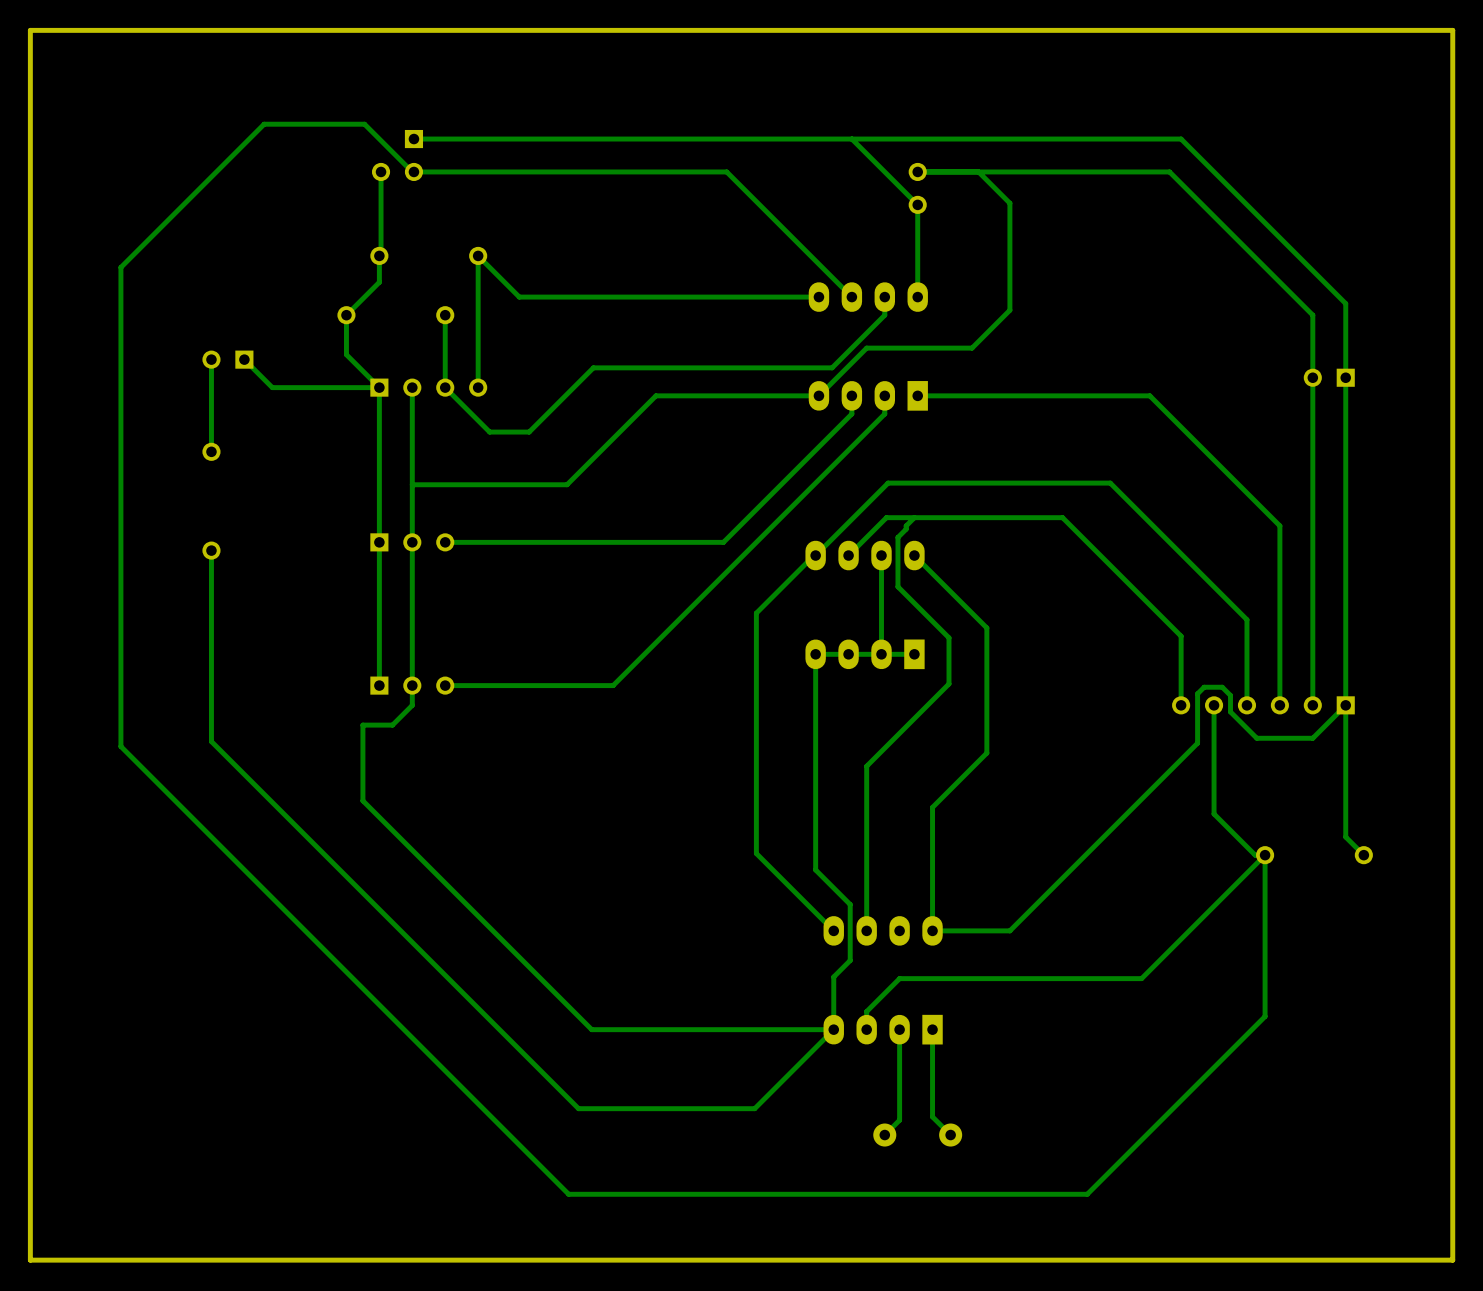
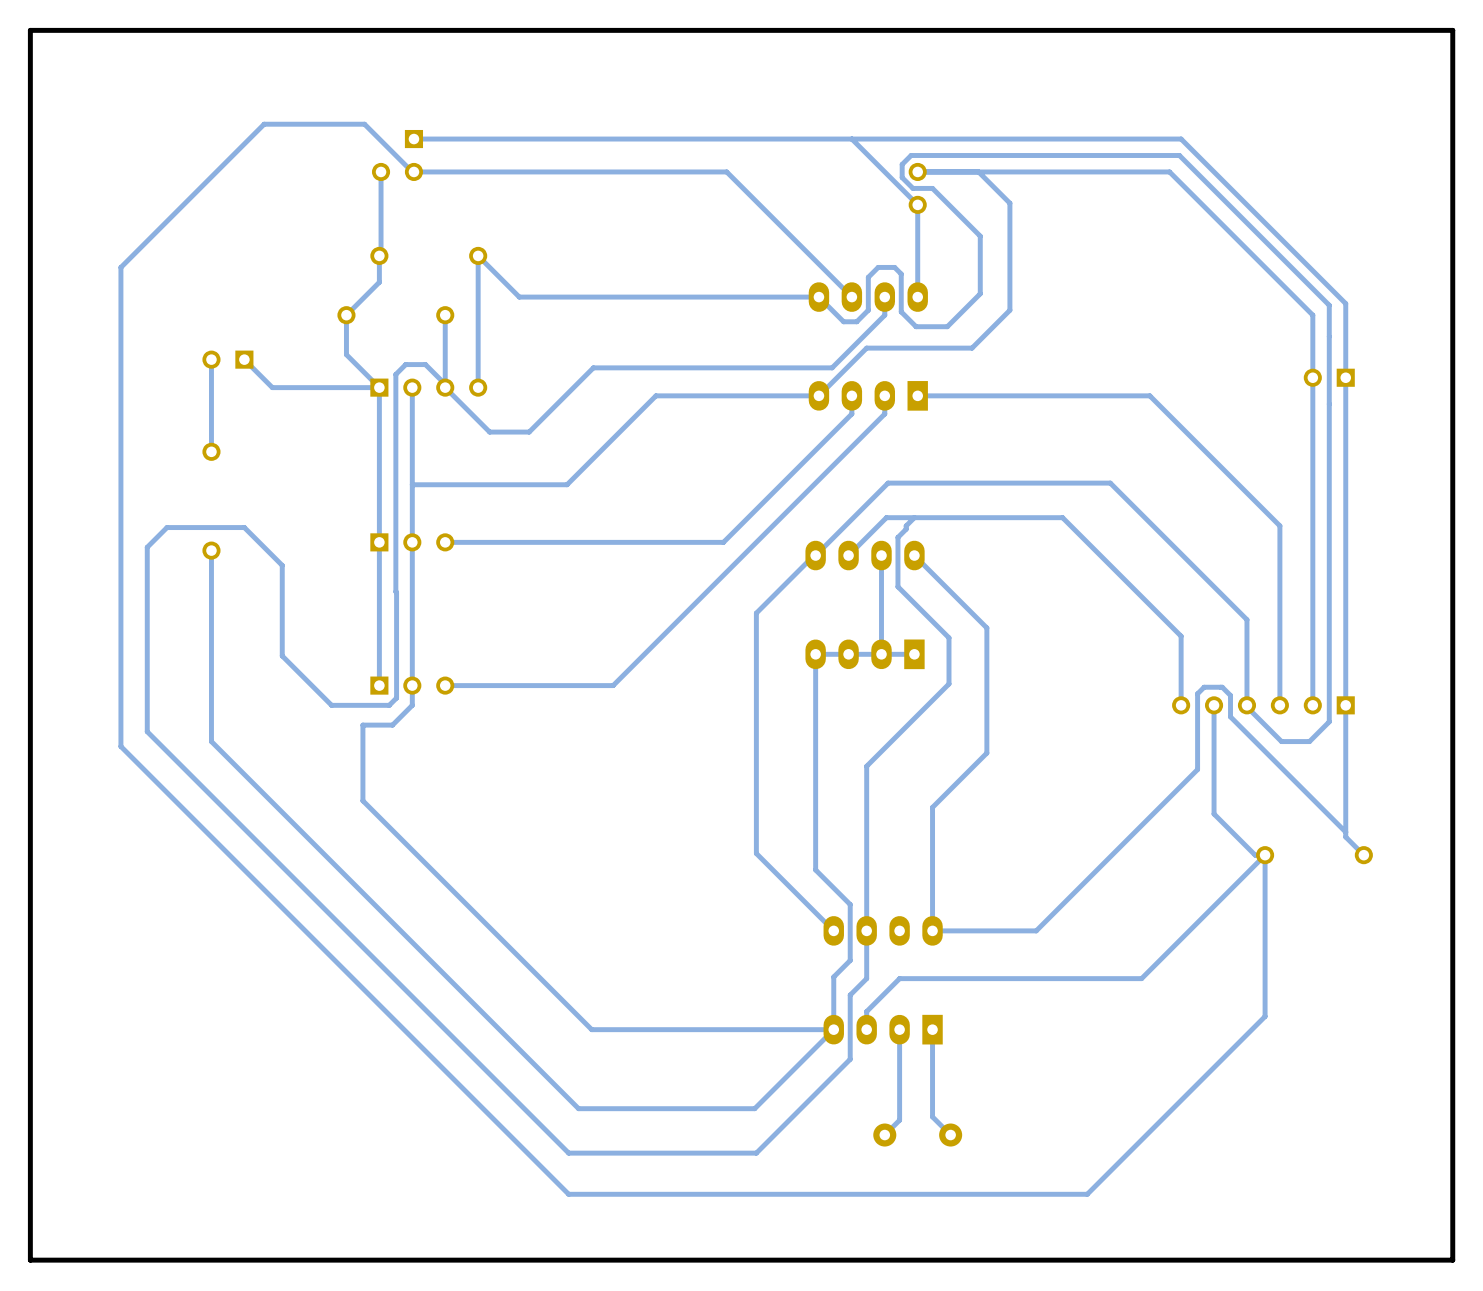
bottom track: none -> (445, 384) (425, 364) (405, 364) (395, 374) (396, 698) (389, 705) (331, 705) (282, 655) (282, 565) (244, 527) (167, 527) (147, 547) (147, 731) (568, 1153) (756, 1153) (850, 1059) (850, 995) (866, 978) (866, 930)
bottom track: (1345, 705) (1329, 721) -> (818, 297) (843, 321) (856, 321) (868, 310) (868, 277) (878, 267) (894, 267) (901, 274) (901, 311) (916, 326) (947, 326) (980, 293) (980, 236) (932, 188) (912, 188) (902, 177) (902, 164) (911, 155) (1179, 155) (1329, 305) (1329, 721)
bottom track: (1230, 711) (1256, 738) (1312, 738) -> (1246, 705) (1281, 741) (1309, 741) (1312, 738)
bottom track: none -> (1230, 711) (1230, 716) (1345, 832)
bottom track: (1197, 743) (1009, 930) -> (1197, 743) (1197, 769) (1036, 930) (1009, 930)

